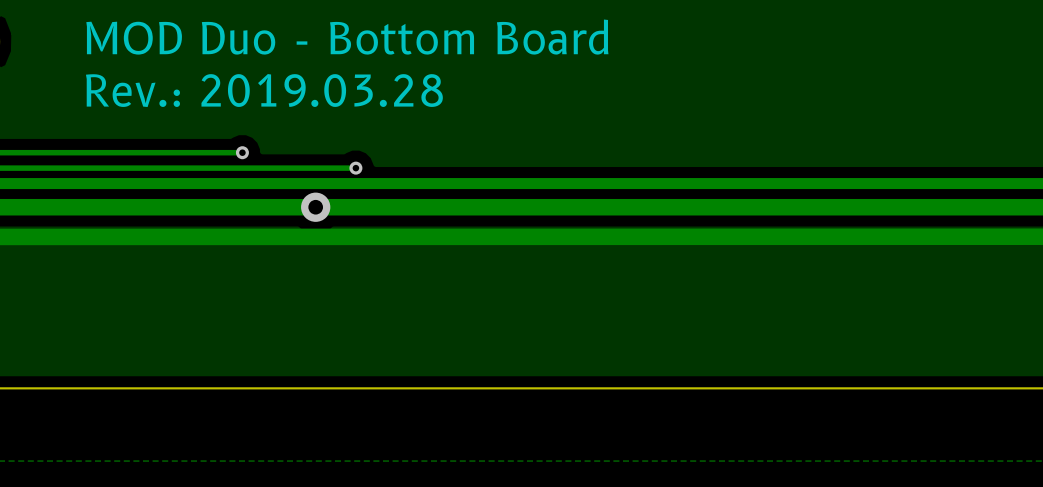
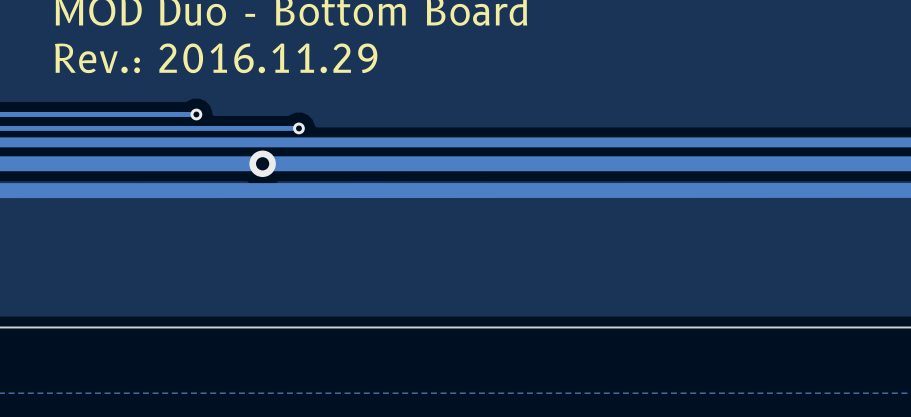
text: Rev.: 2019.03.28 (264, 90) -> Rev.: 2016.11.29 (216, 58)

